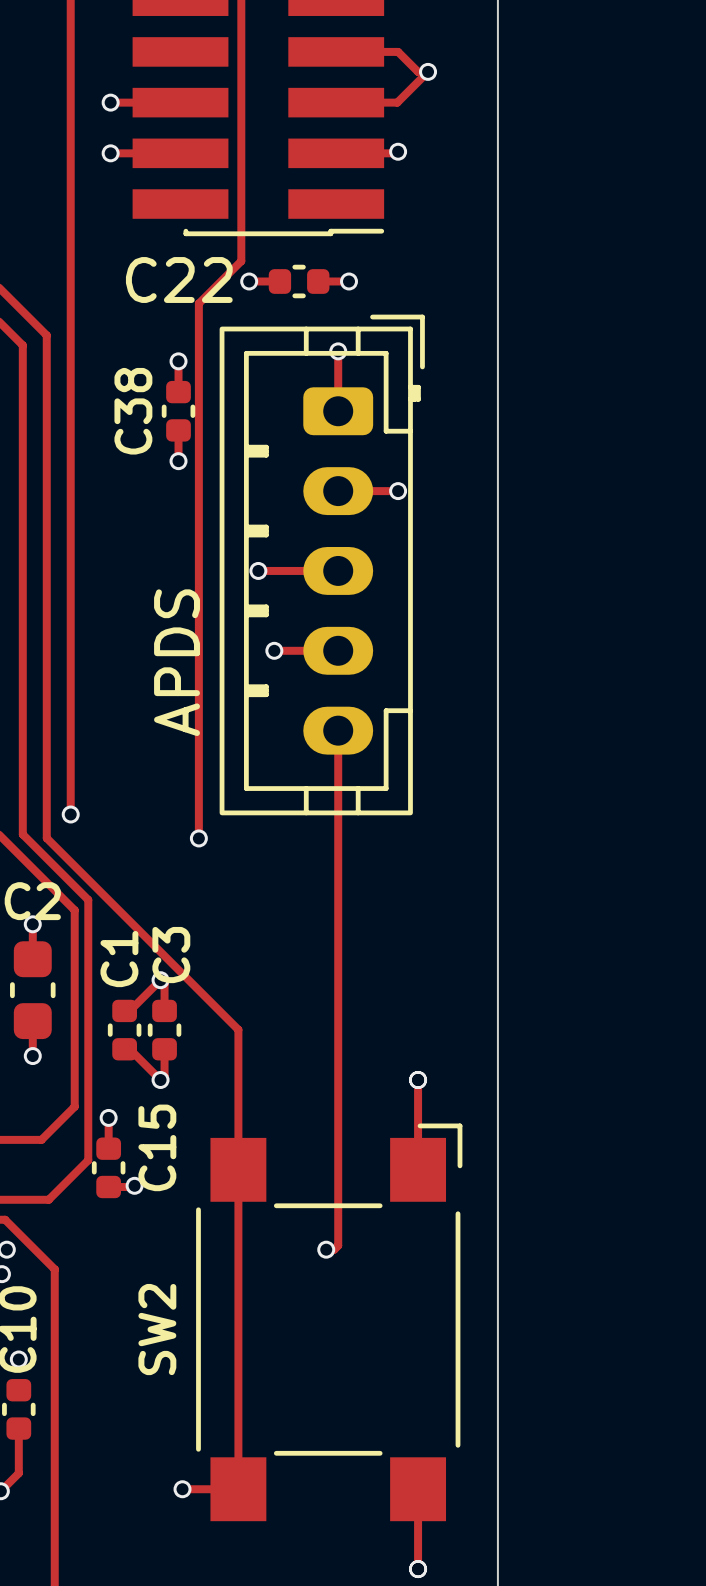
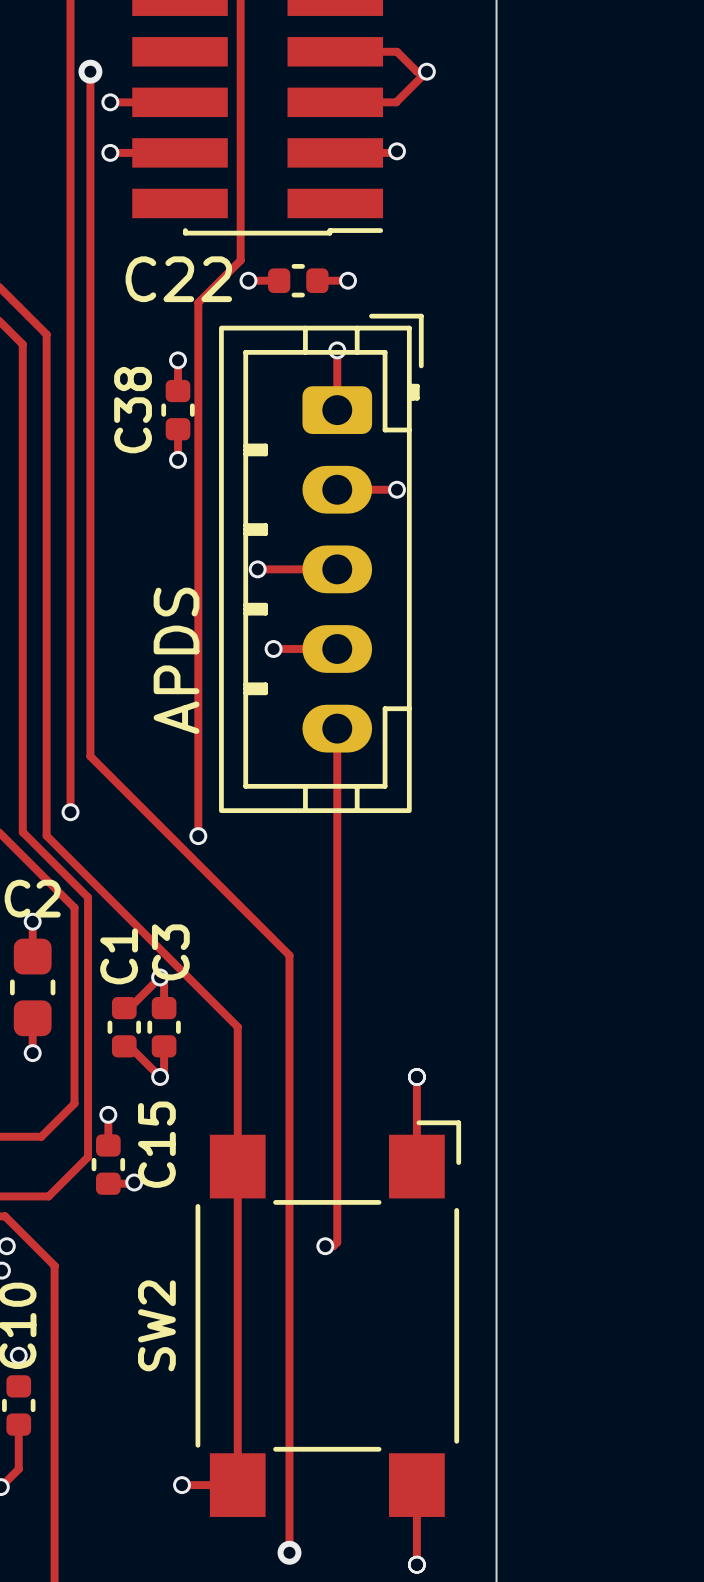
track: none -> (90, 71) (90, 756) (289, 955) (289, 1552)
via: none -> (90, 71)
via: none -> (289, 1552)

